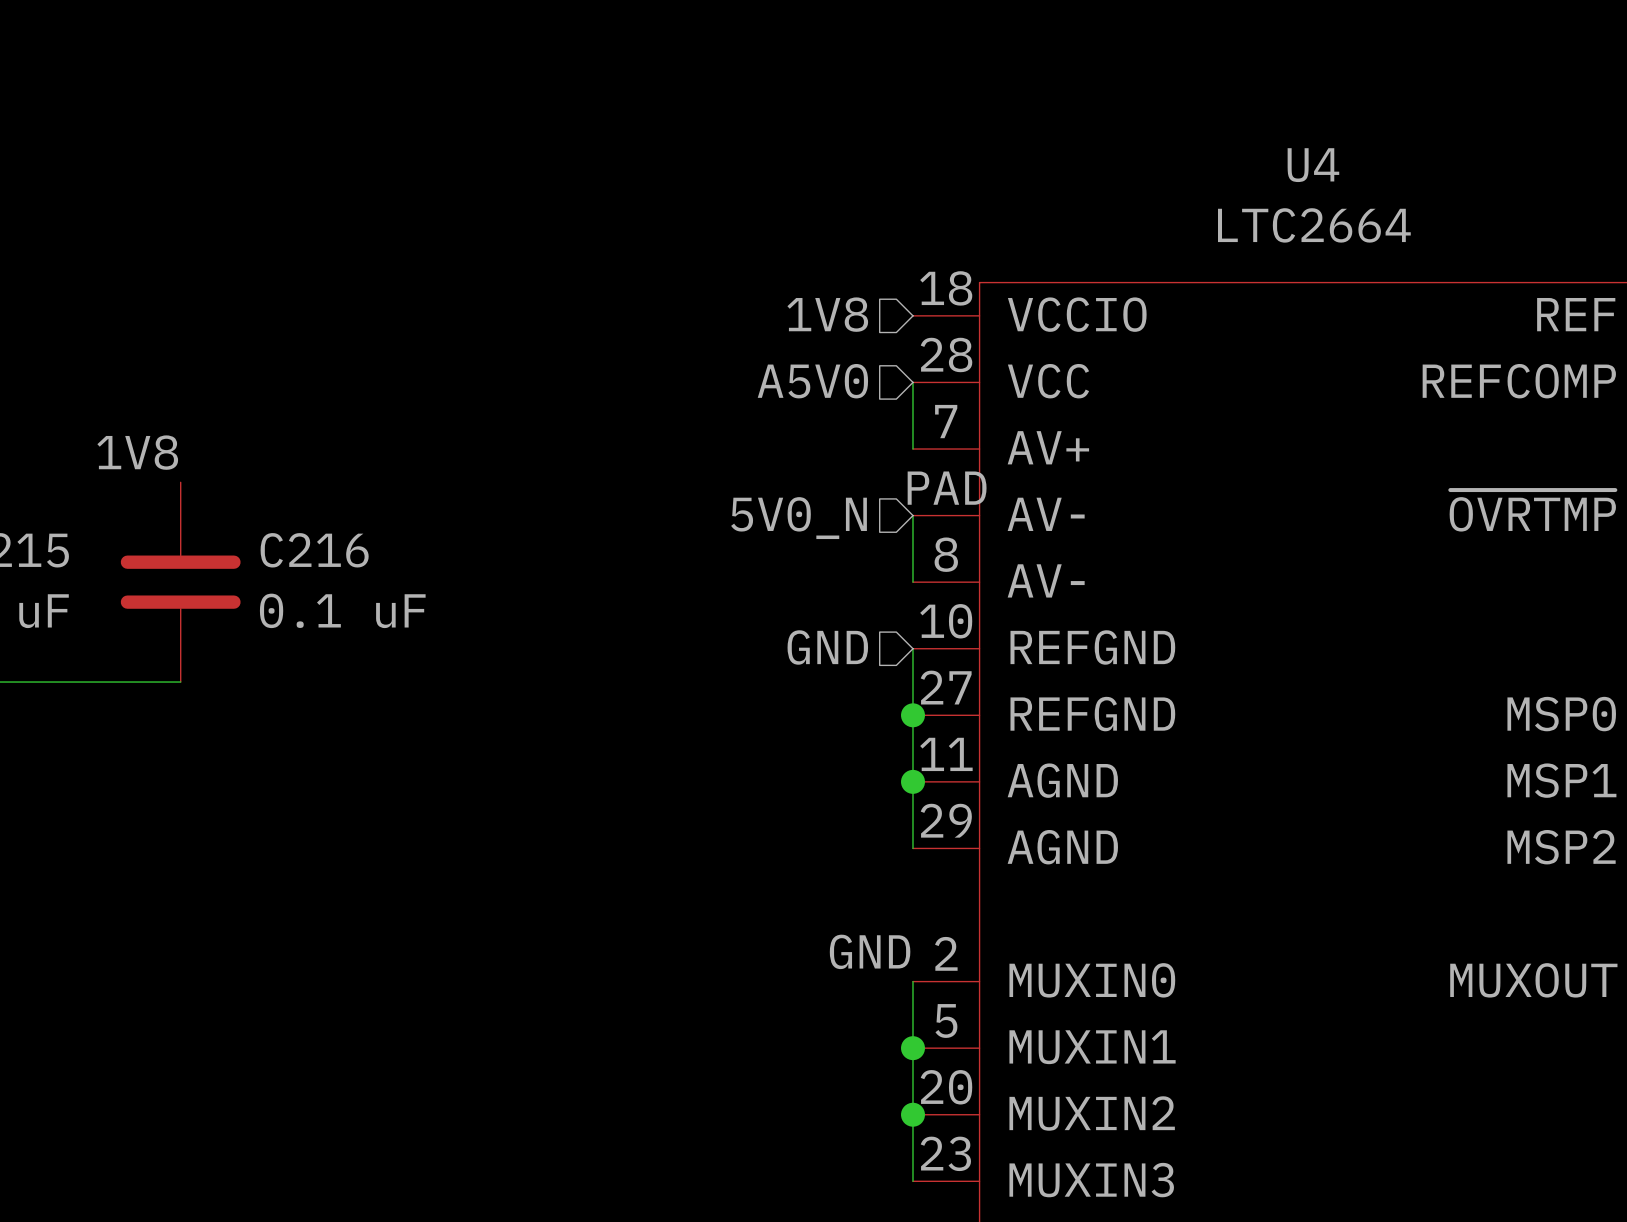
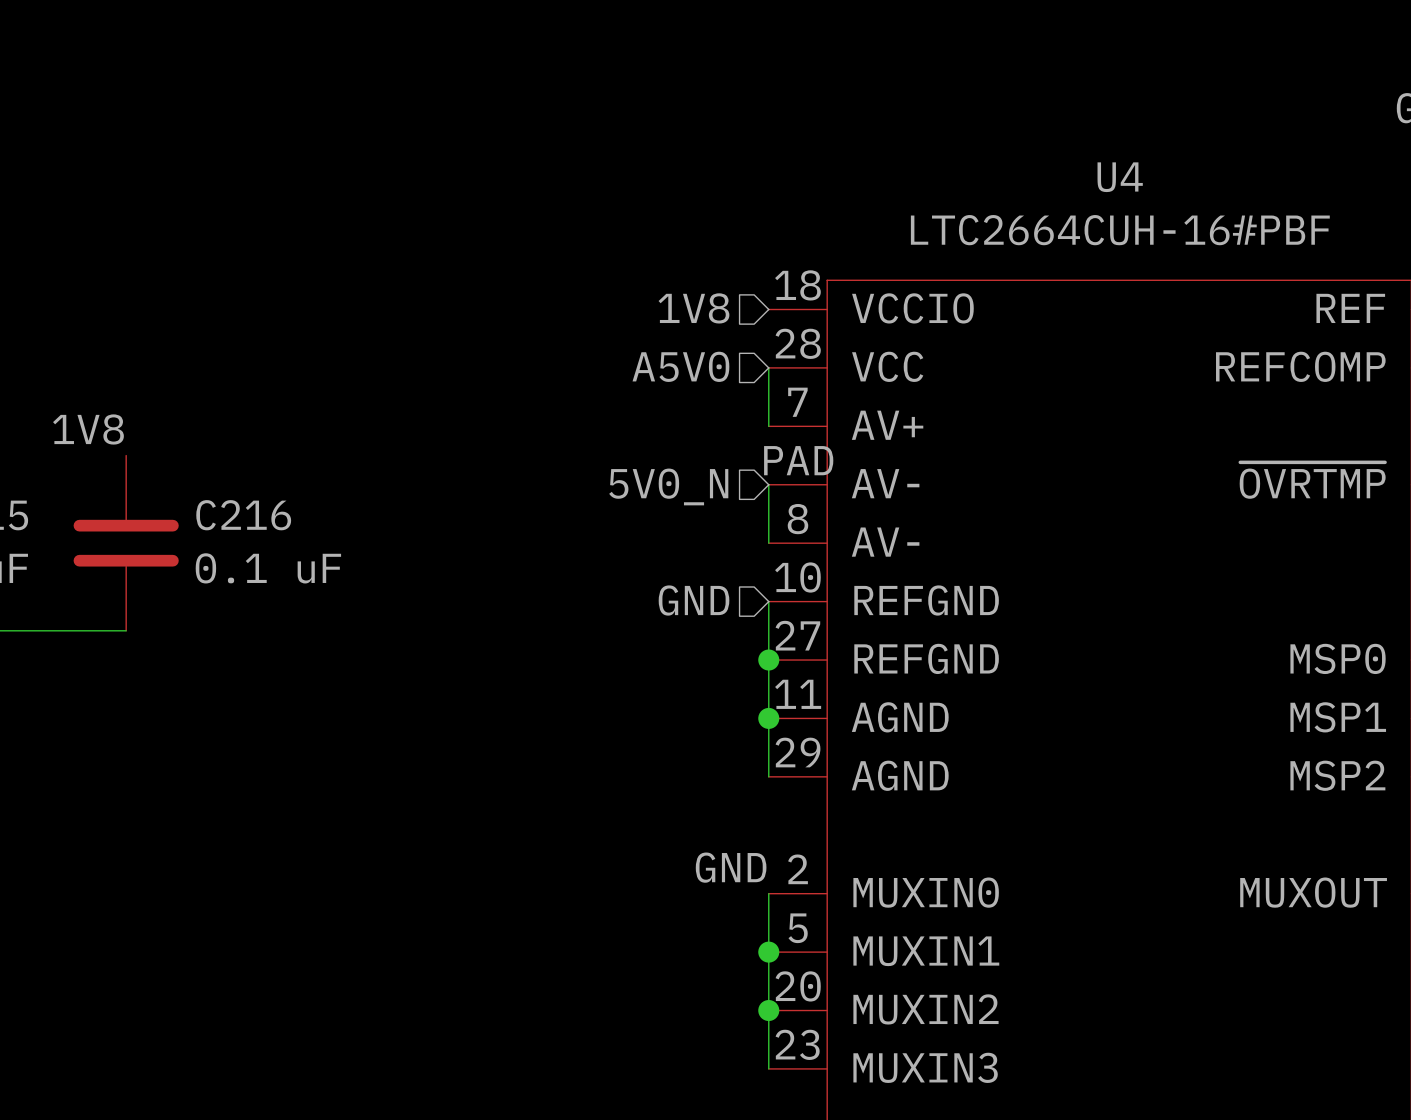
U4 value: LTC2664 (1314, 225) -> LTC2664CUH-16#PBF (1120, 230)

